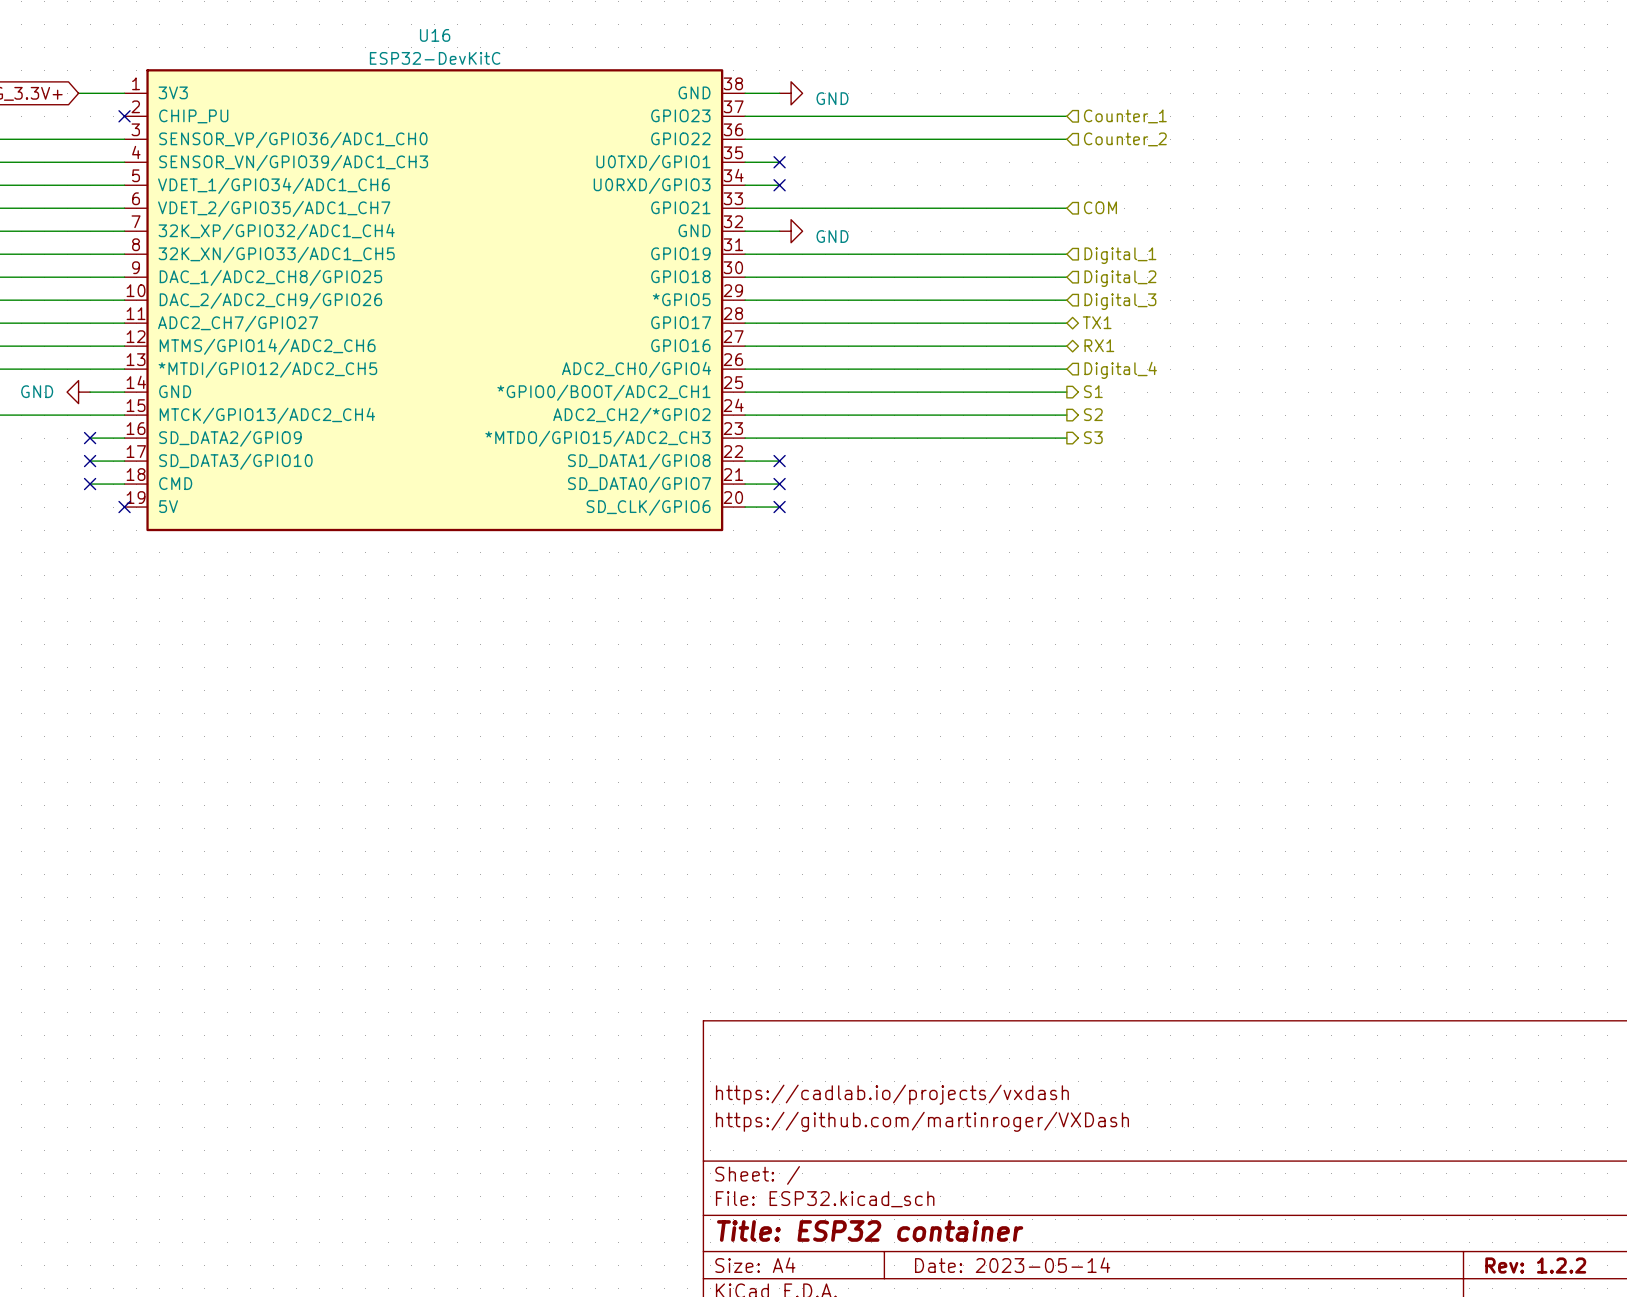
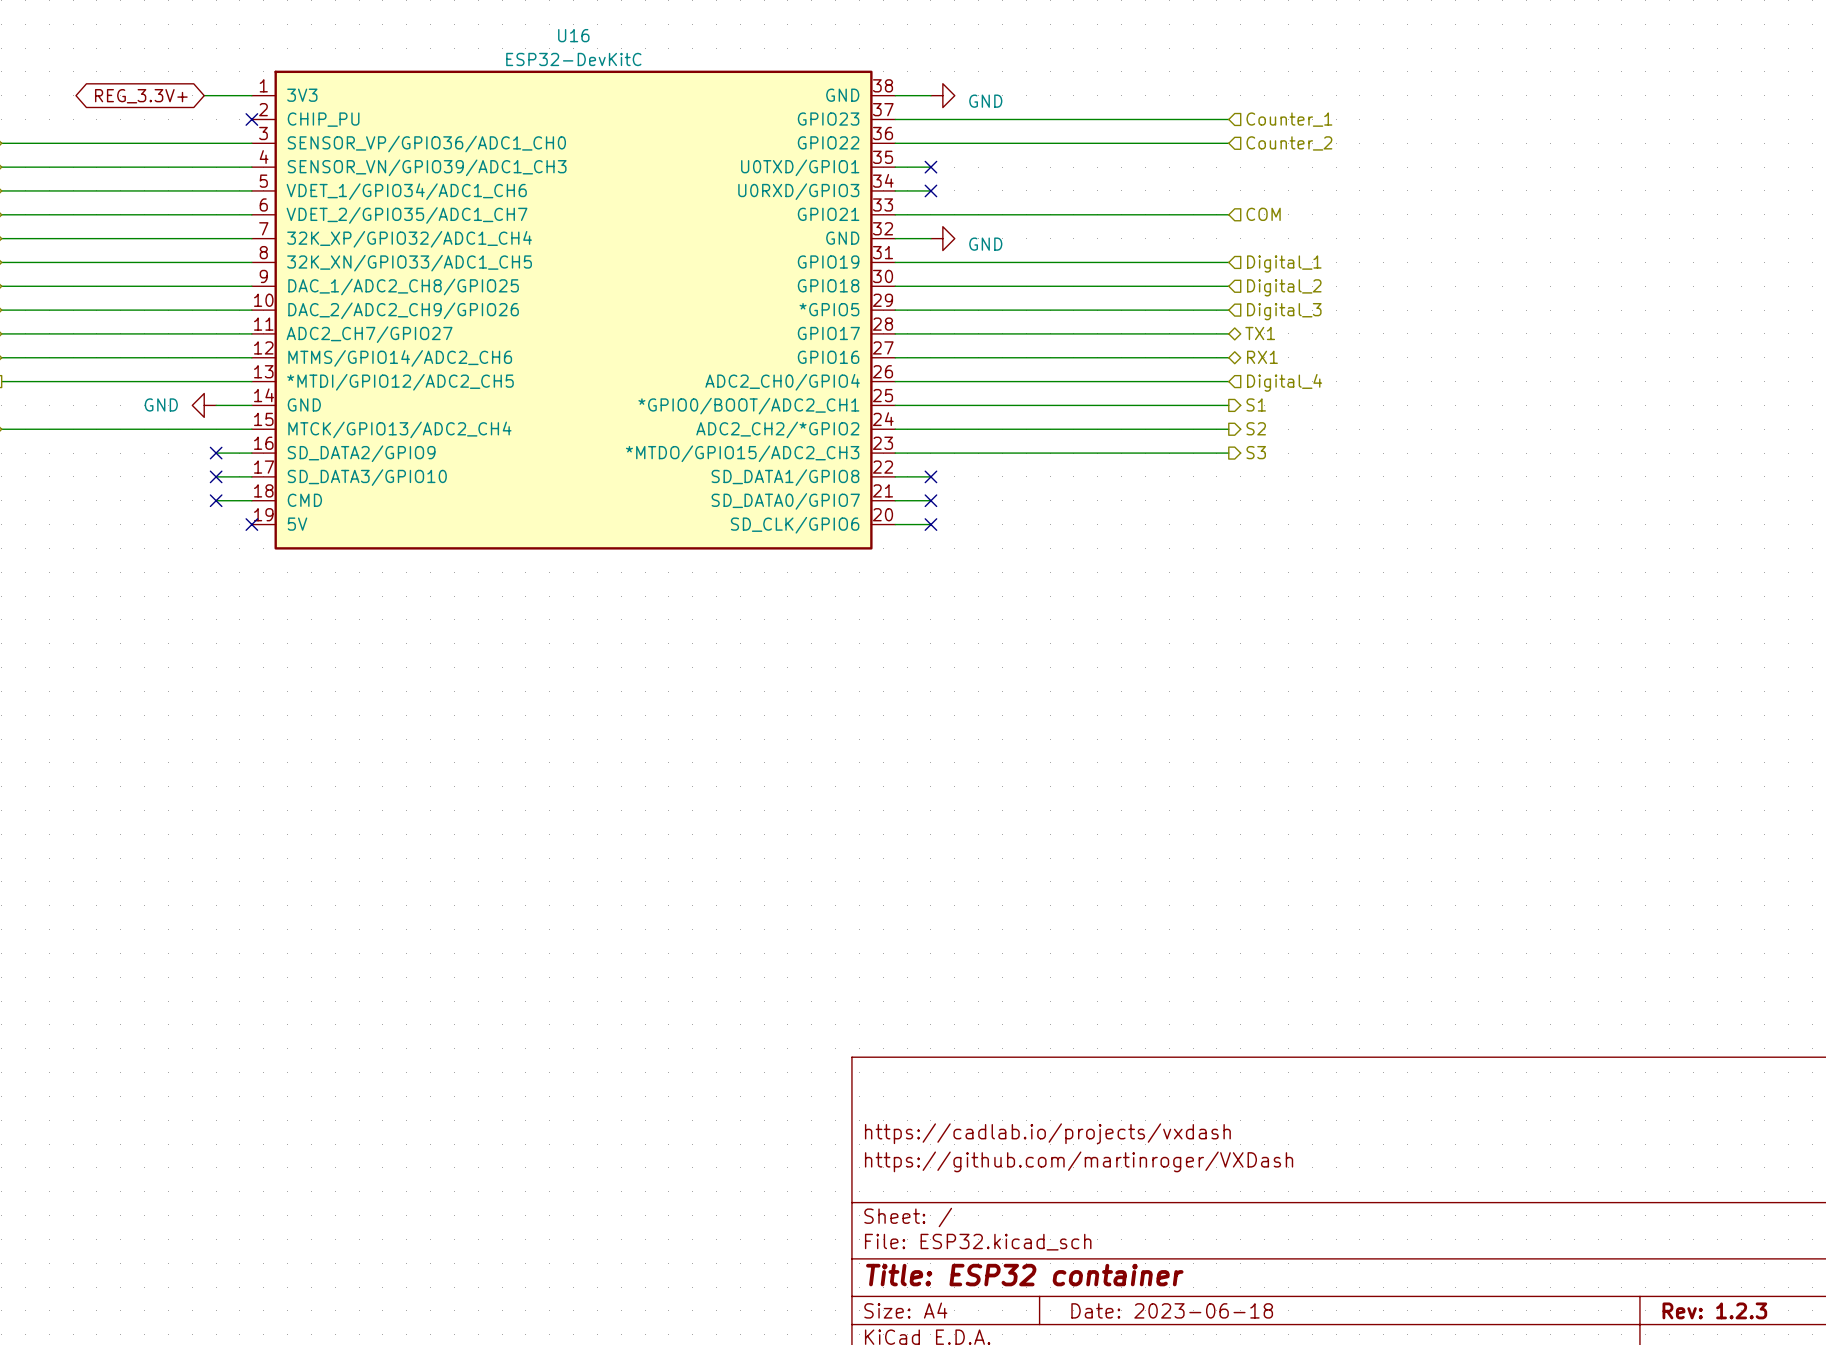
title block: Date: 2023-05-14 (1012, 1265) -> Date: 2023-06-18 (1172, 1310)
title block: Rev: 1.2.2 (1535, 1265) -> Rev: 1.2.3 (1714, 1310)

